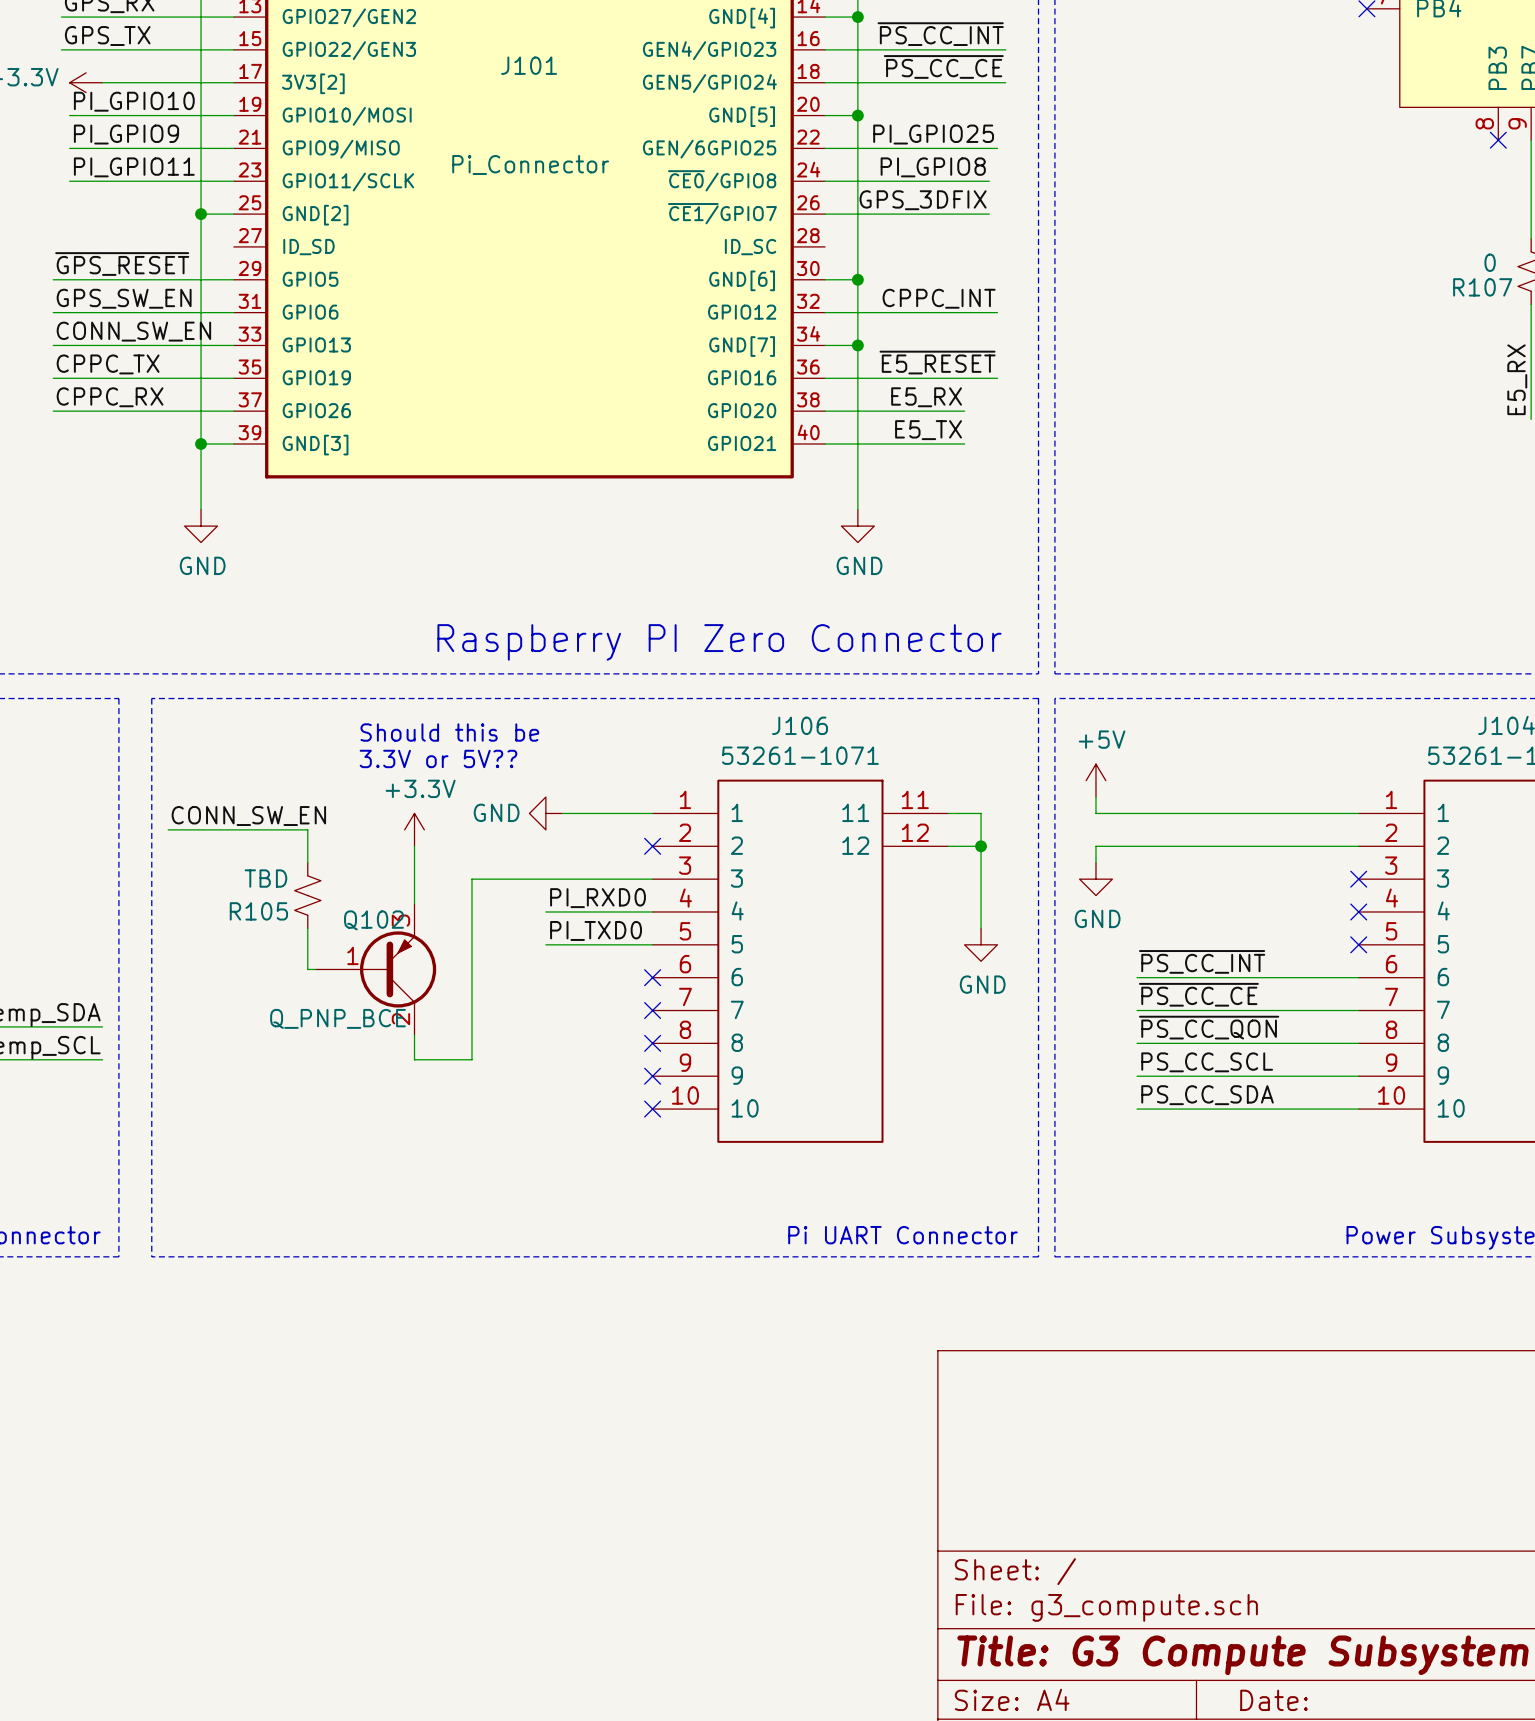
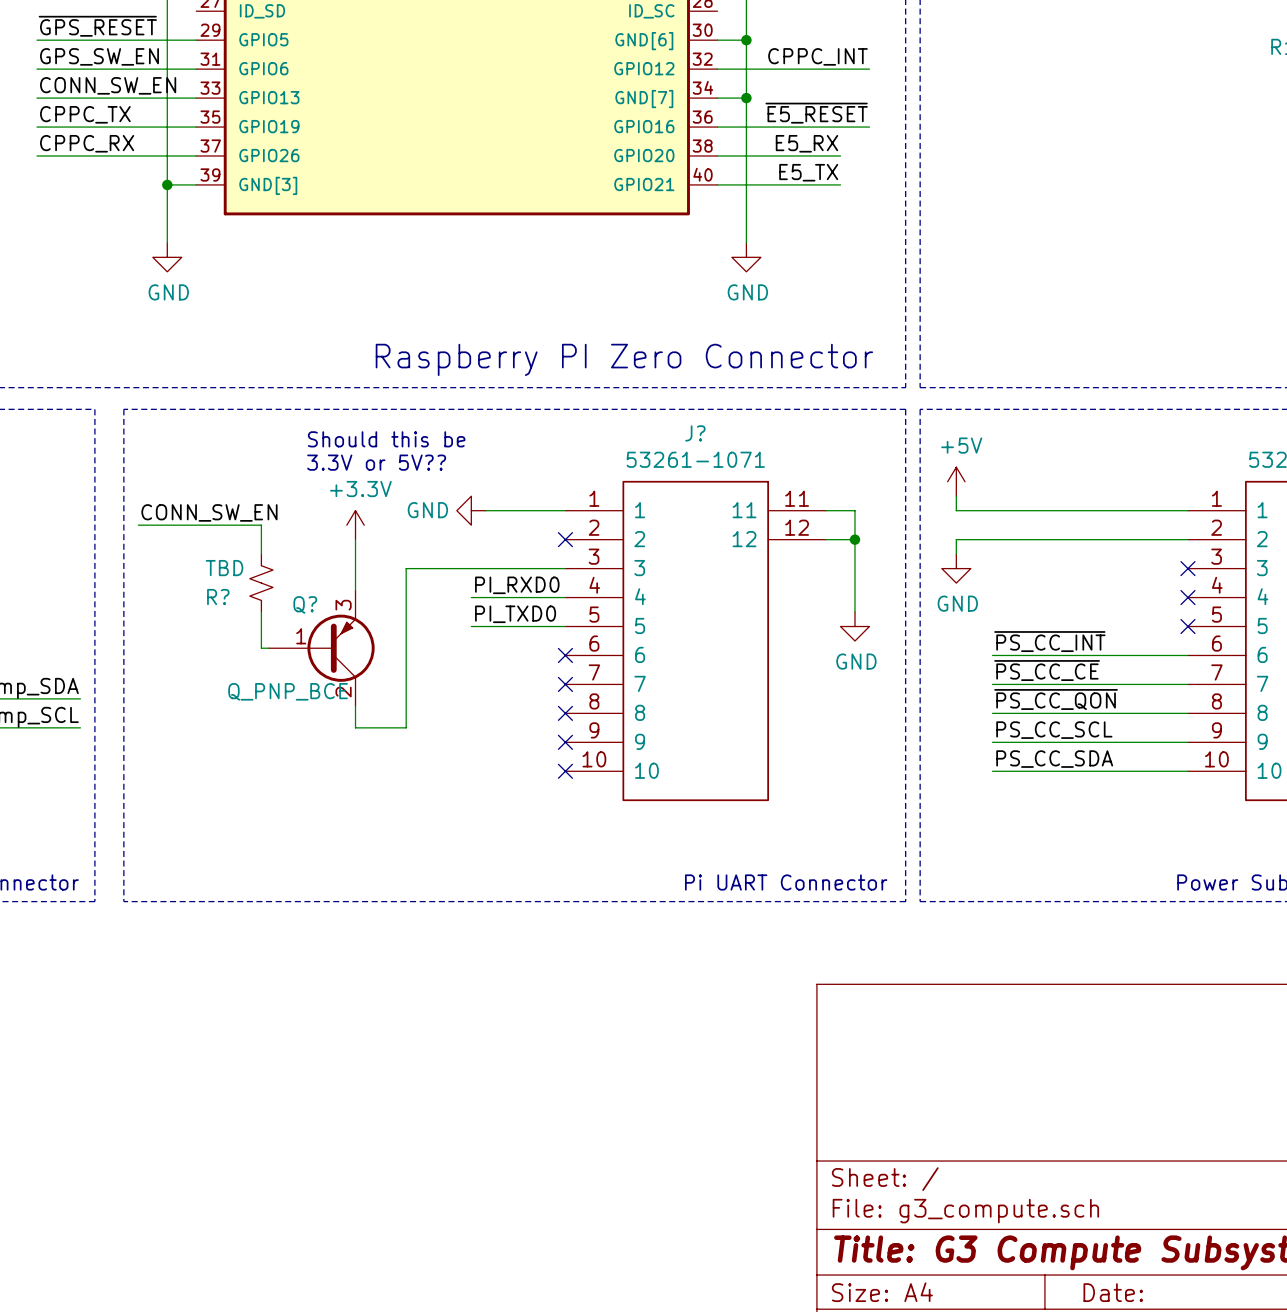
J106 name: J106 (800, 725) -> J? (695, 433)
R105 name: R105 (258, 911) -> R? (218, 597)
Q102 name: Q102 (373, 920) -> Q? (305, 604)

